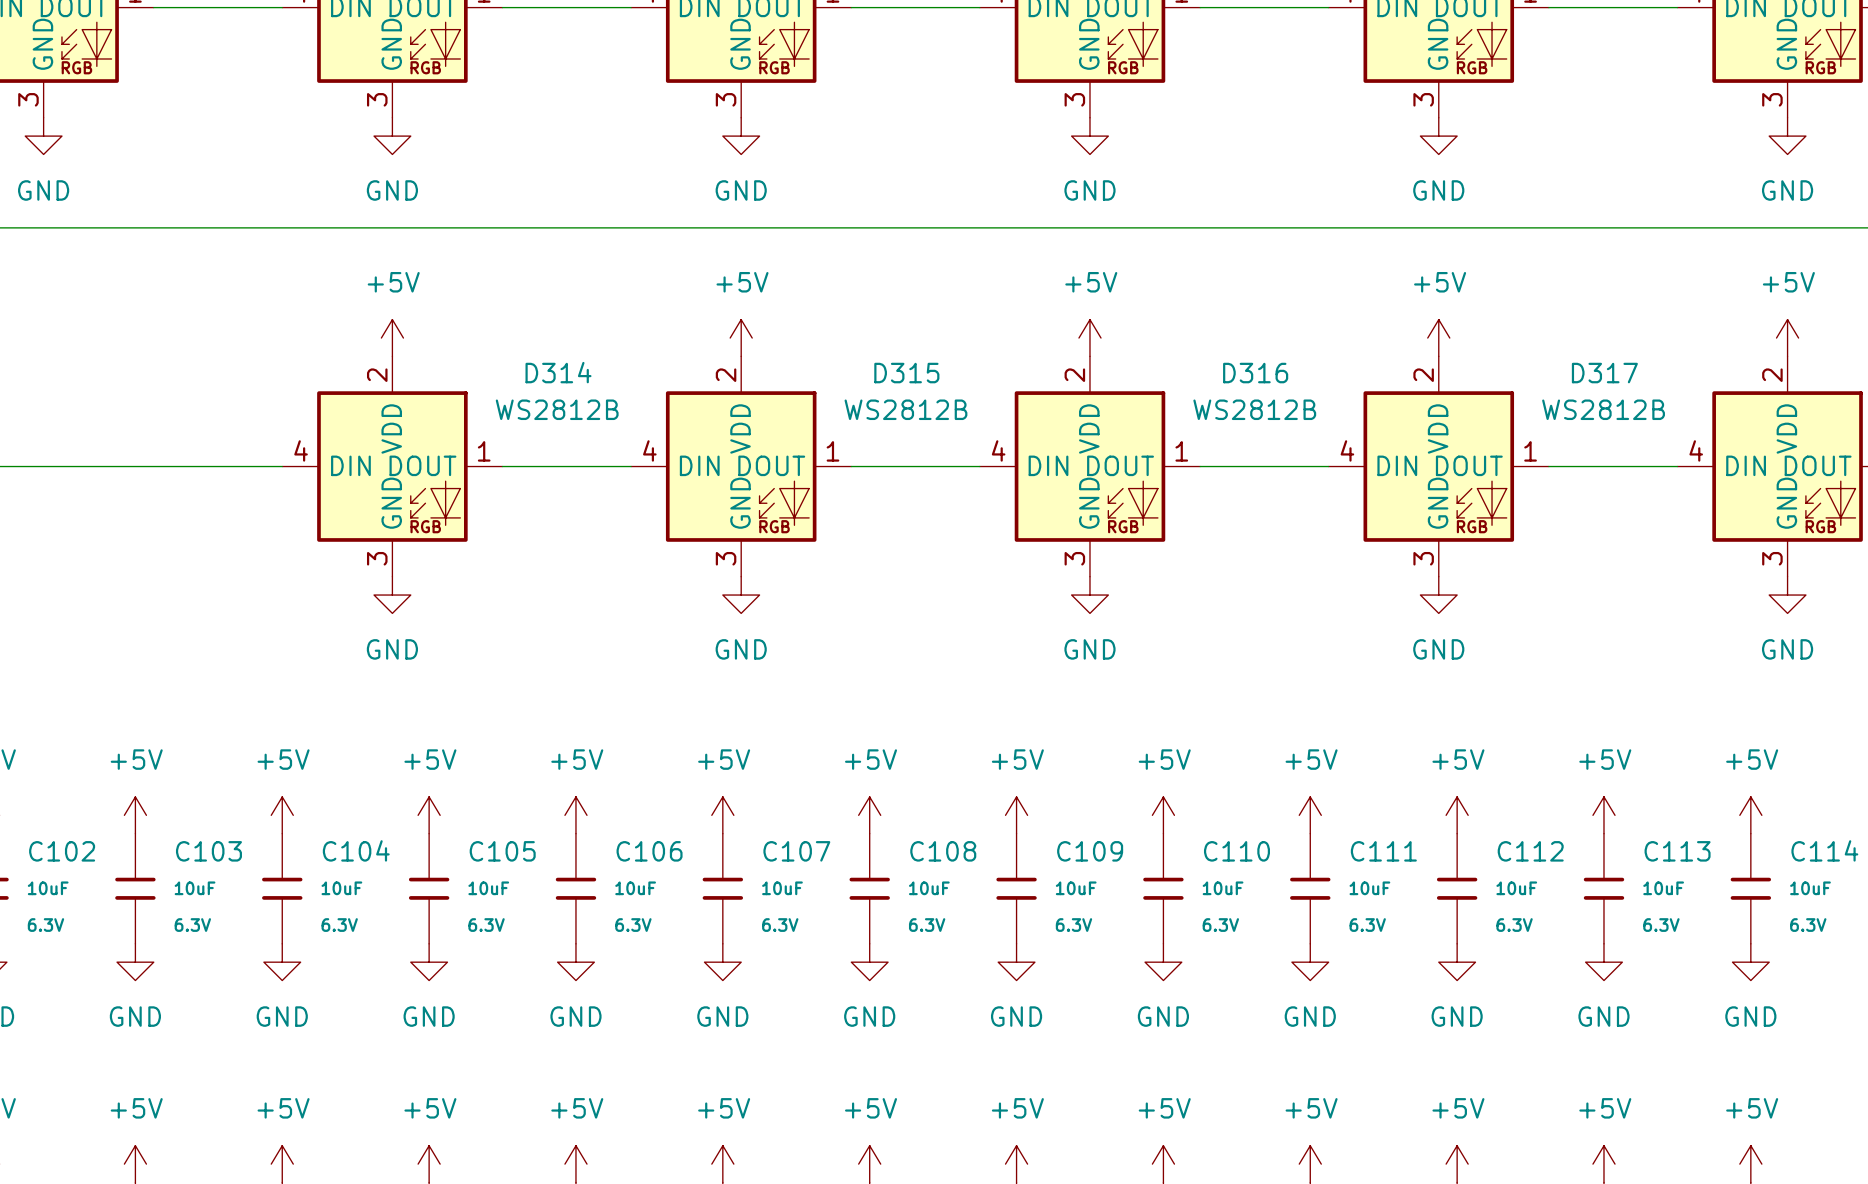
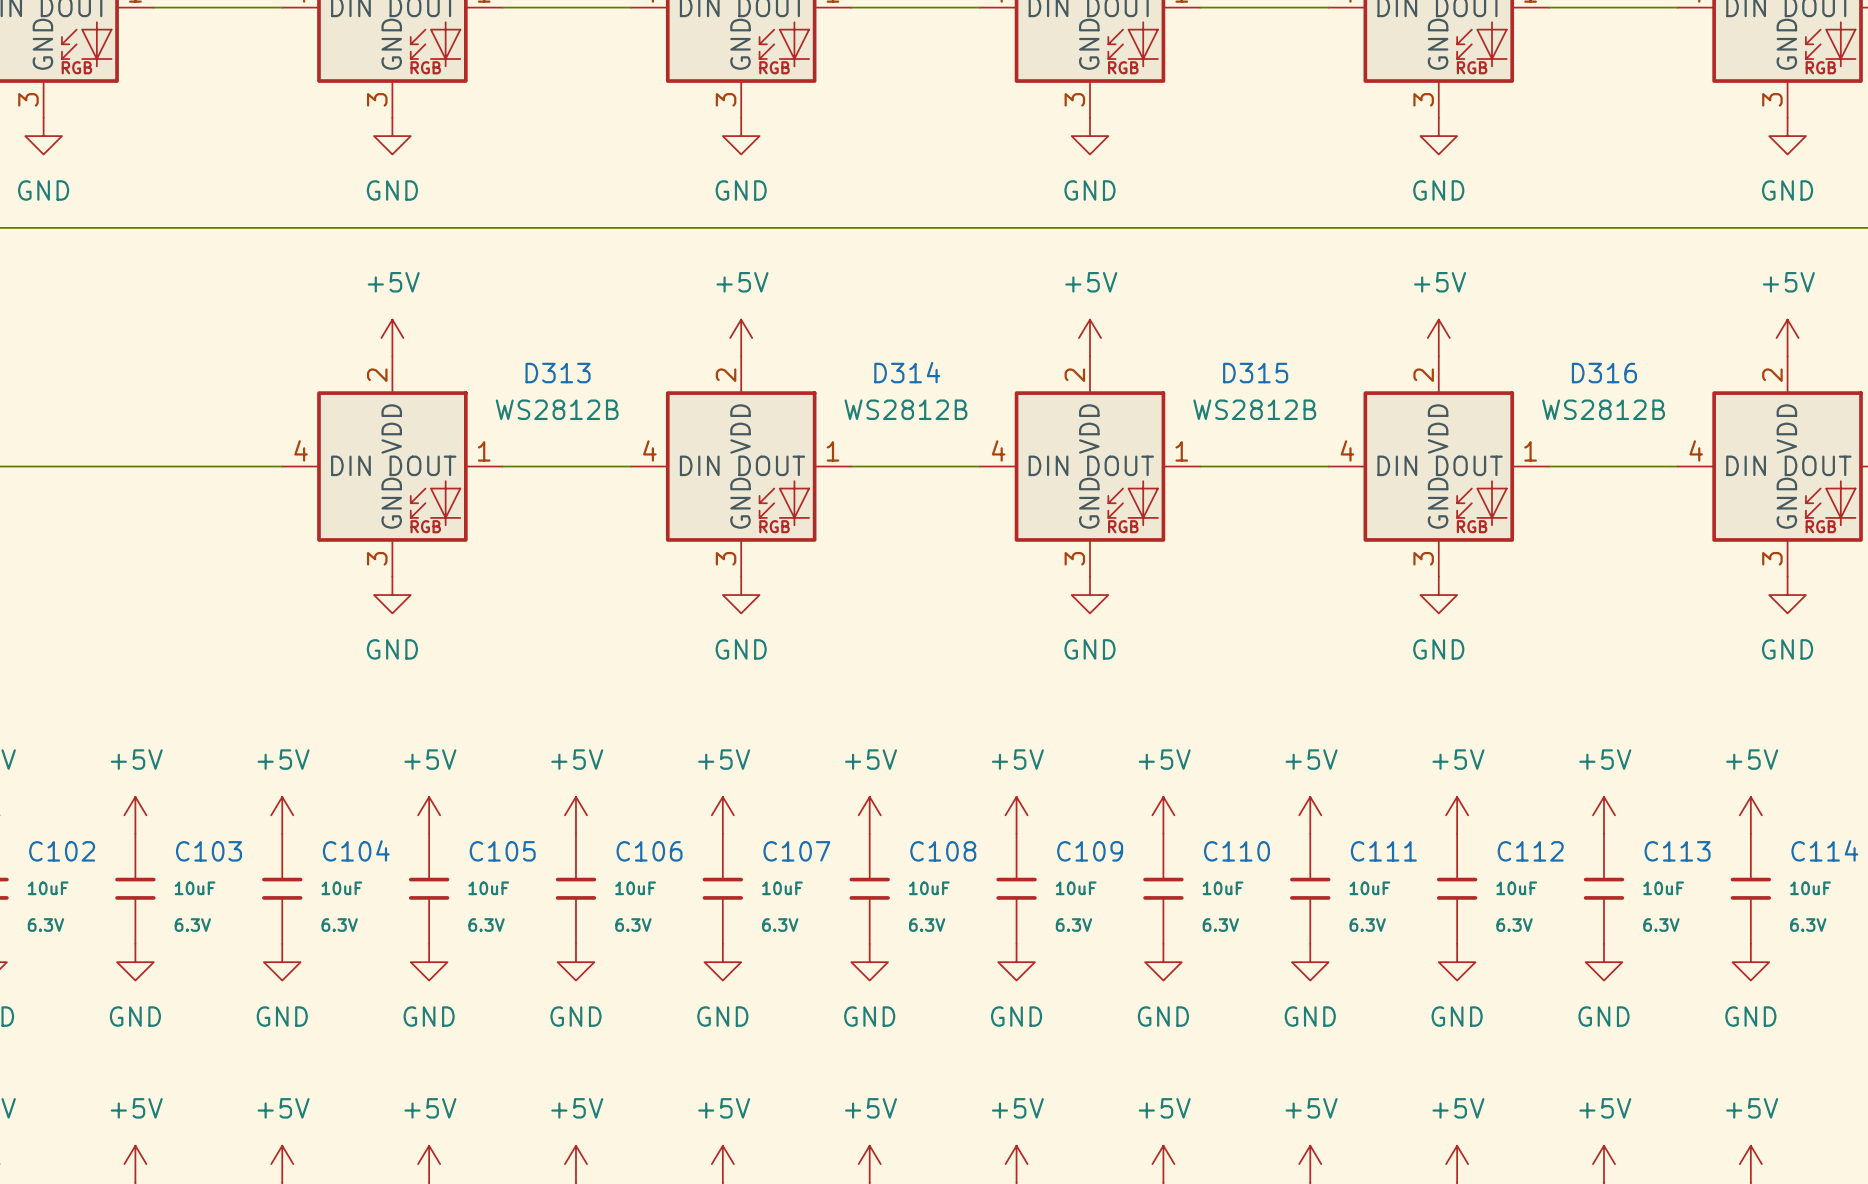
D314 name: D314 (558, 372) -> D313 (558, 373)
D315 name: D315 (906, 373) -> D314 (907, 372)
D316 name: D316 (1255, 373) -> D315 (1255, 373)
D317 name: D317 (1604, 373) -> D316 (1604, 373)

